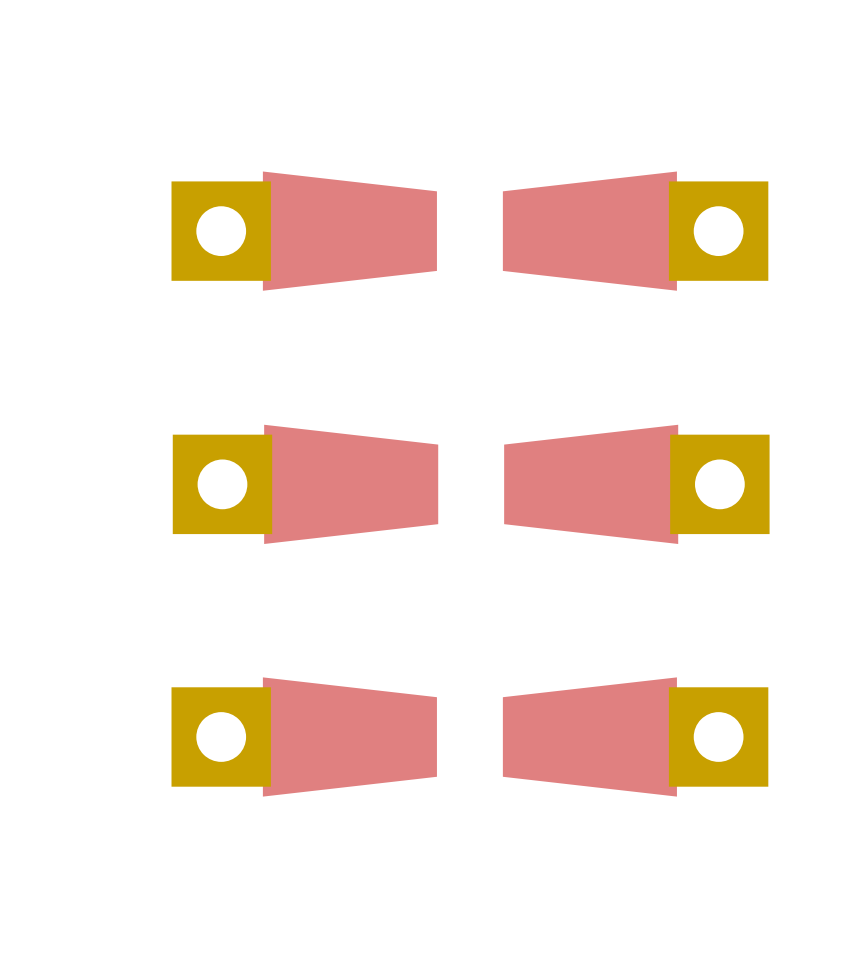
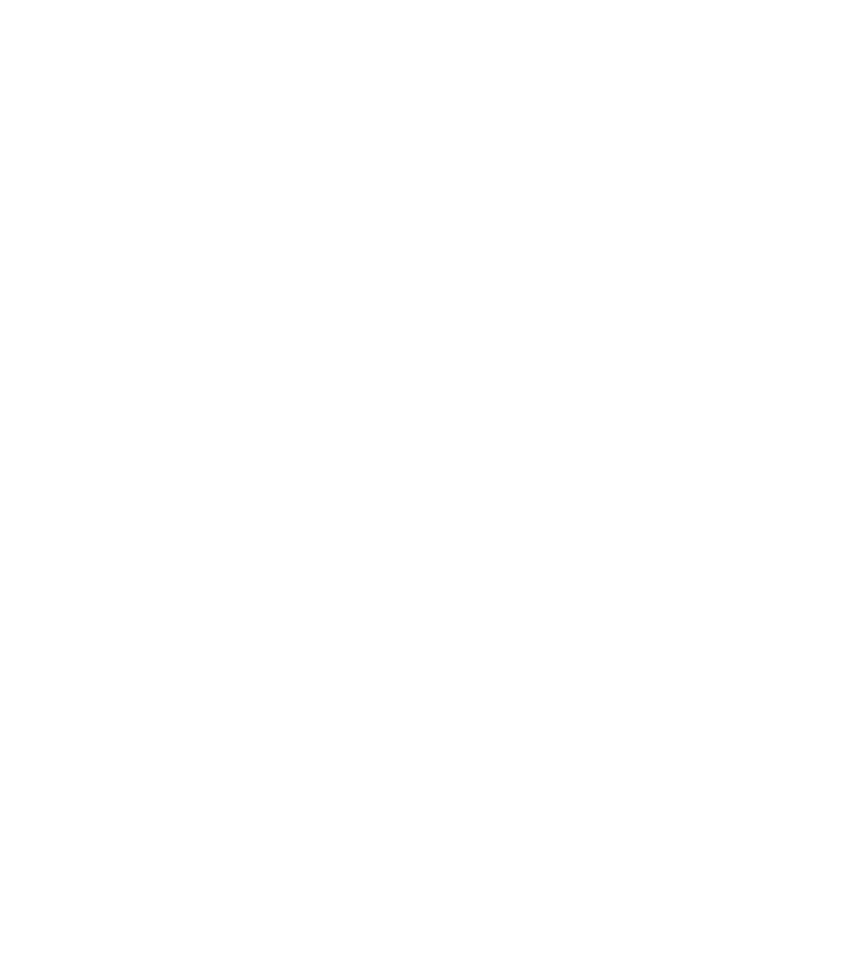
part: (469, 231) -> none
part: (471, 484) -> none
part: (469, 736) -> none

